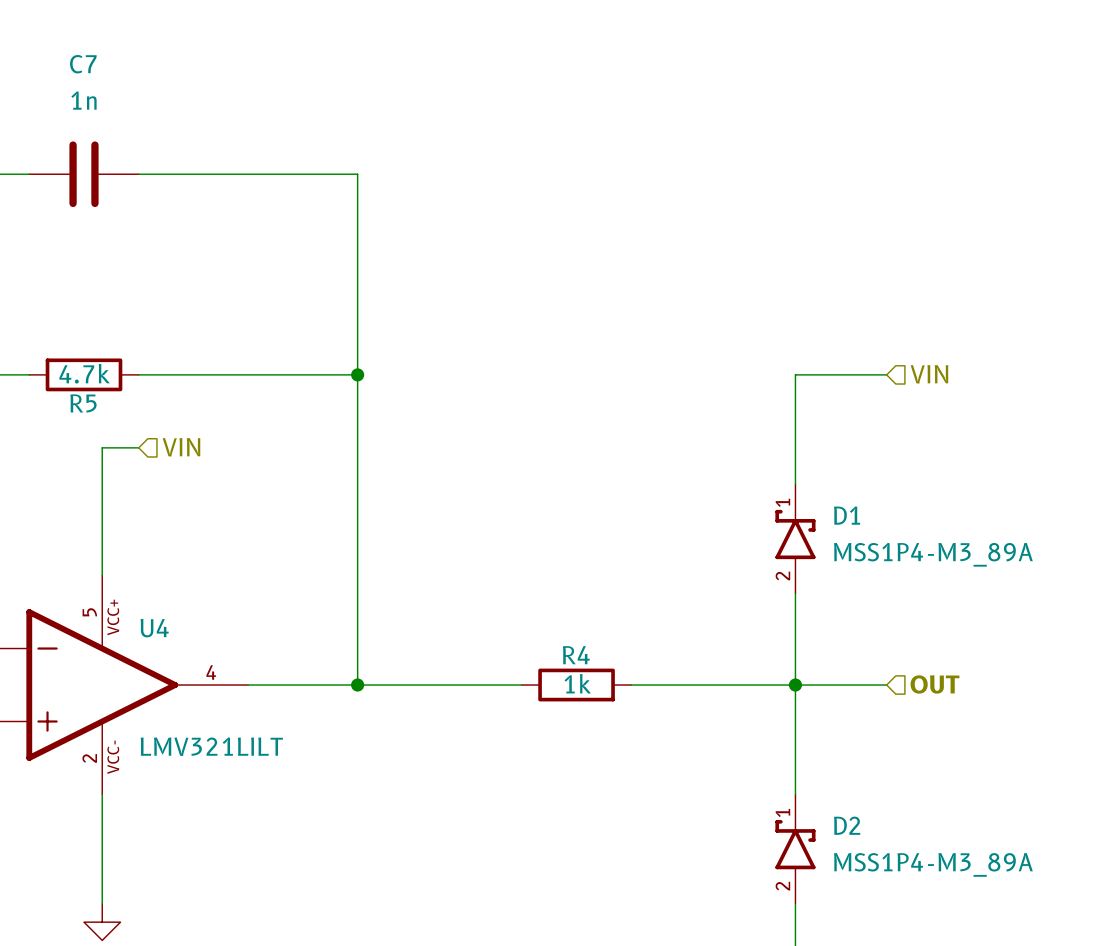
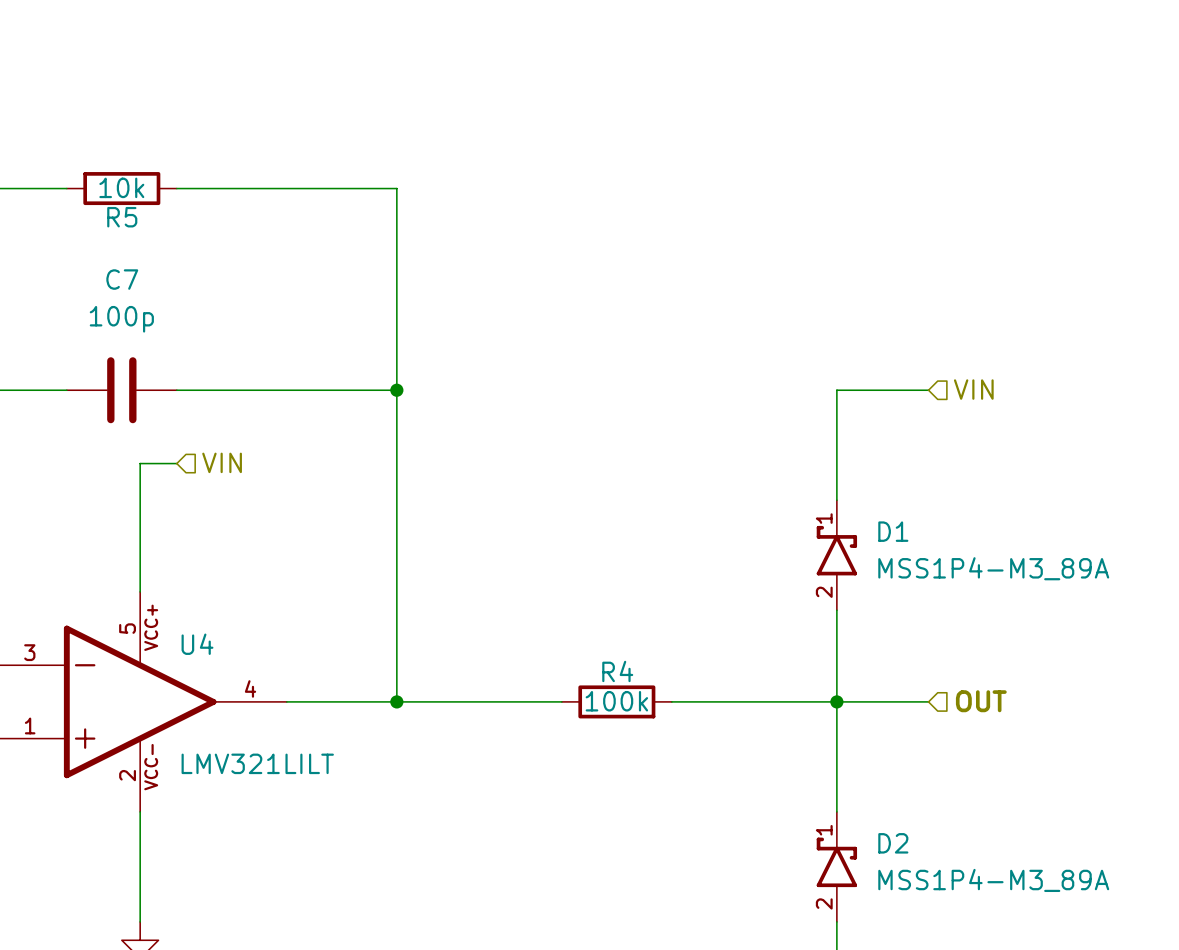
C7 value: 1n (83, 100) -> 100p (121, 319)
C7 position: (84, 174) -> (121, 390)
R5 value: 4.7k (84, 373) -> 10k (121, 187)
R5 position: (84, 374) -> (121, 188)
R4 value: 1k (577, 683) -> 100k (616, 701)

